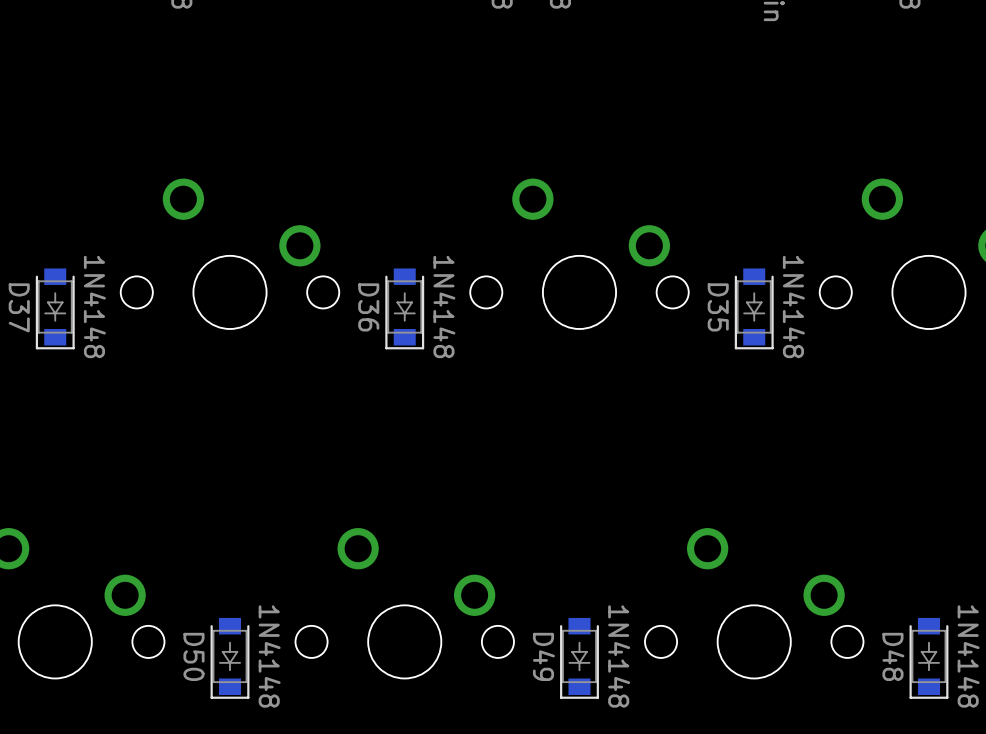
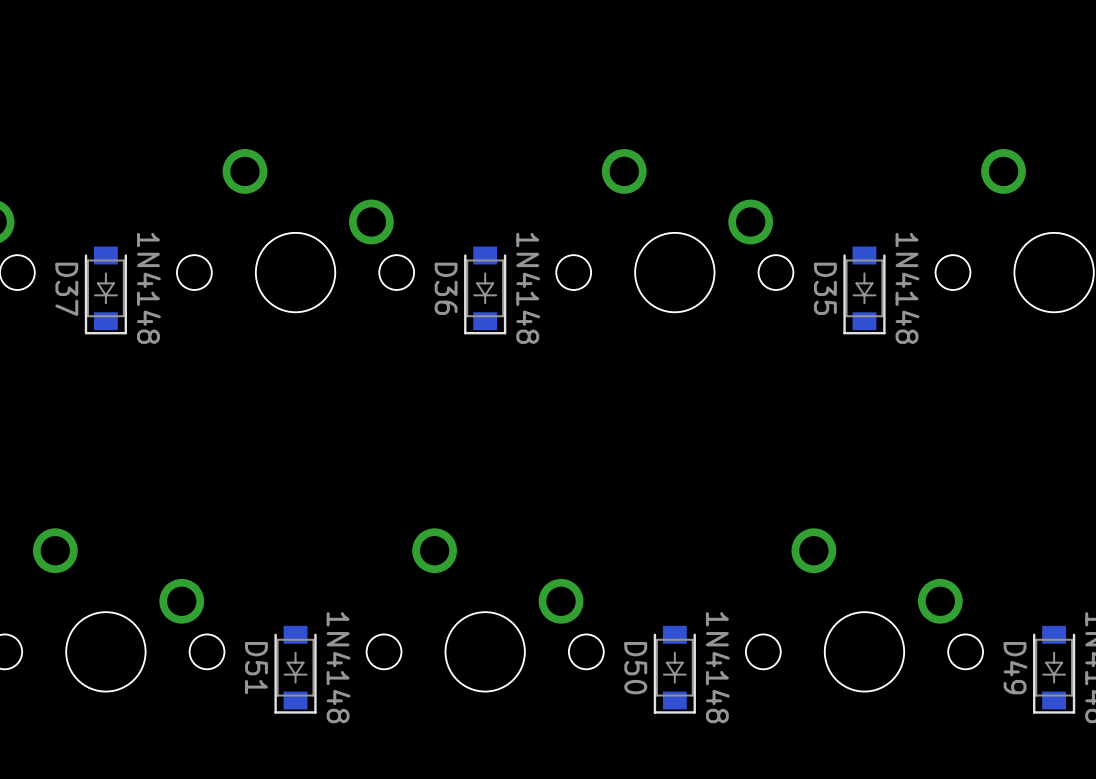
D50 name: D50 (193, 656) -> D51 (256, 668)
D49 name: D49 (543, 656) -> D50 (635, 668)
D48 name: D48 (893, 656) -> D49 (1015, 668)

